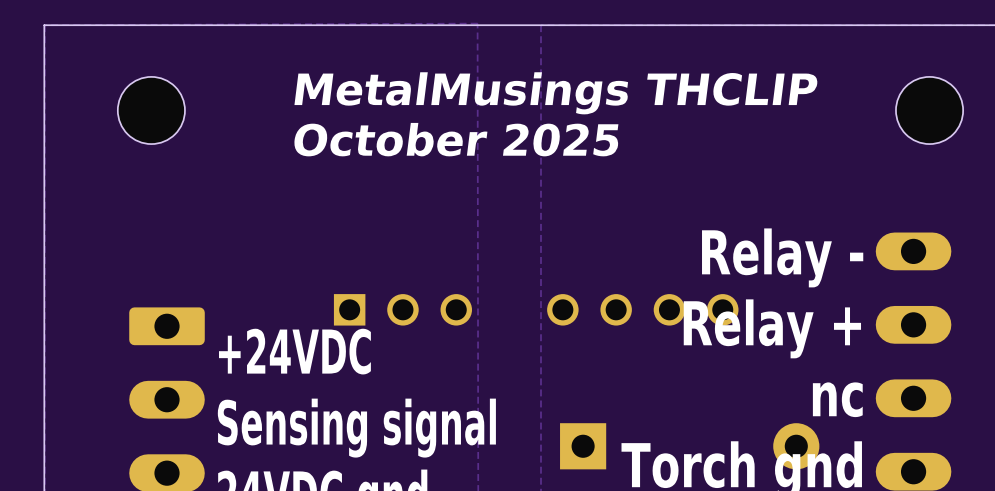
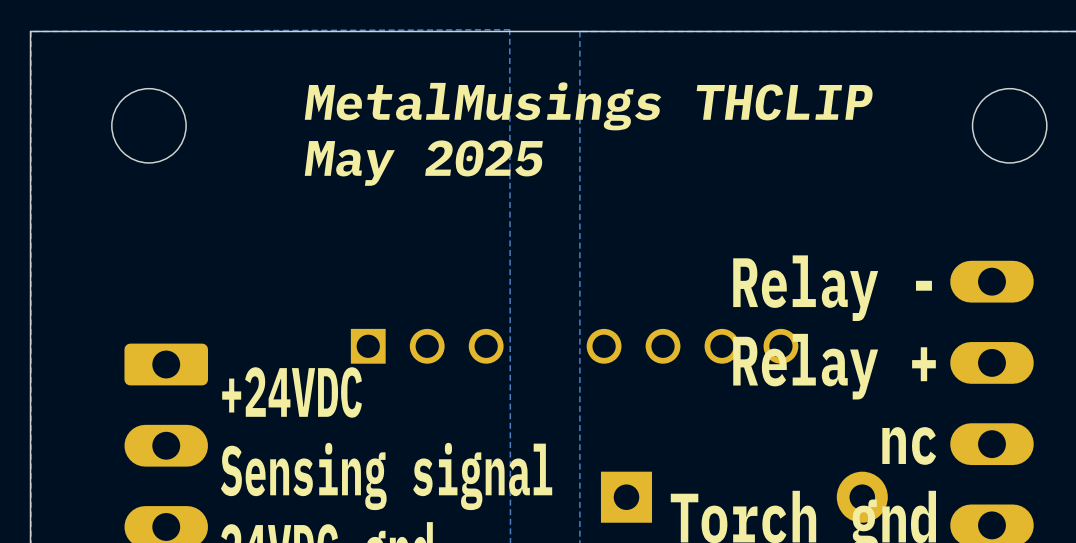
text: October 2025 (456, 139) -> May 2025 (423, 163)

